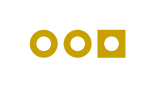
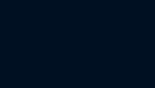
part: (77, 43) -> none

